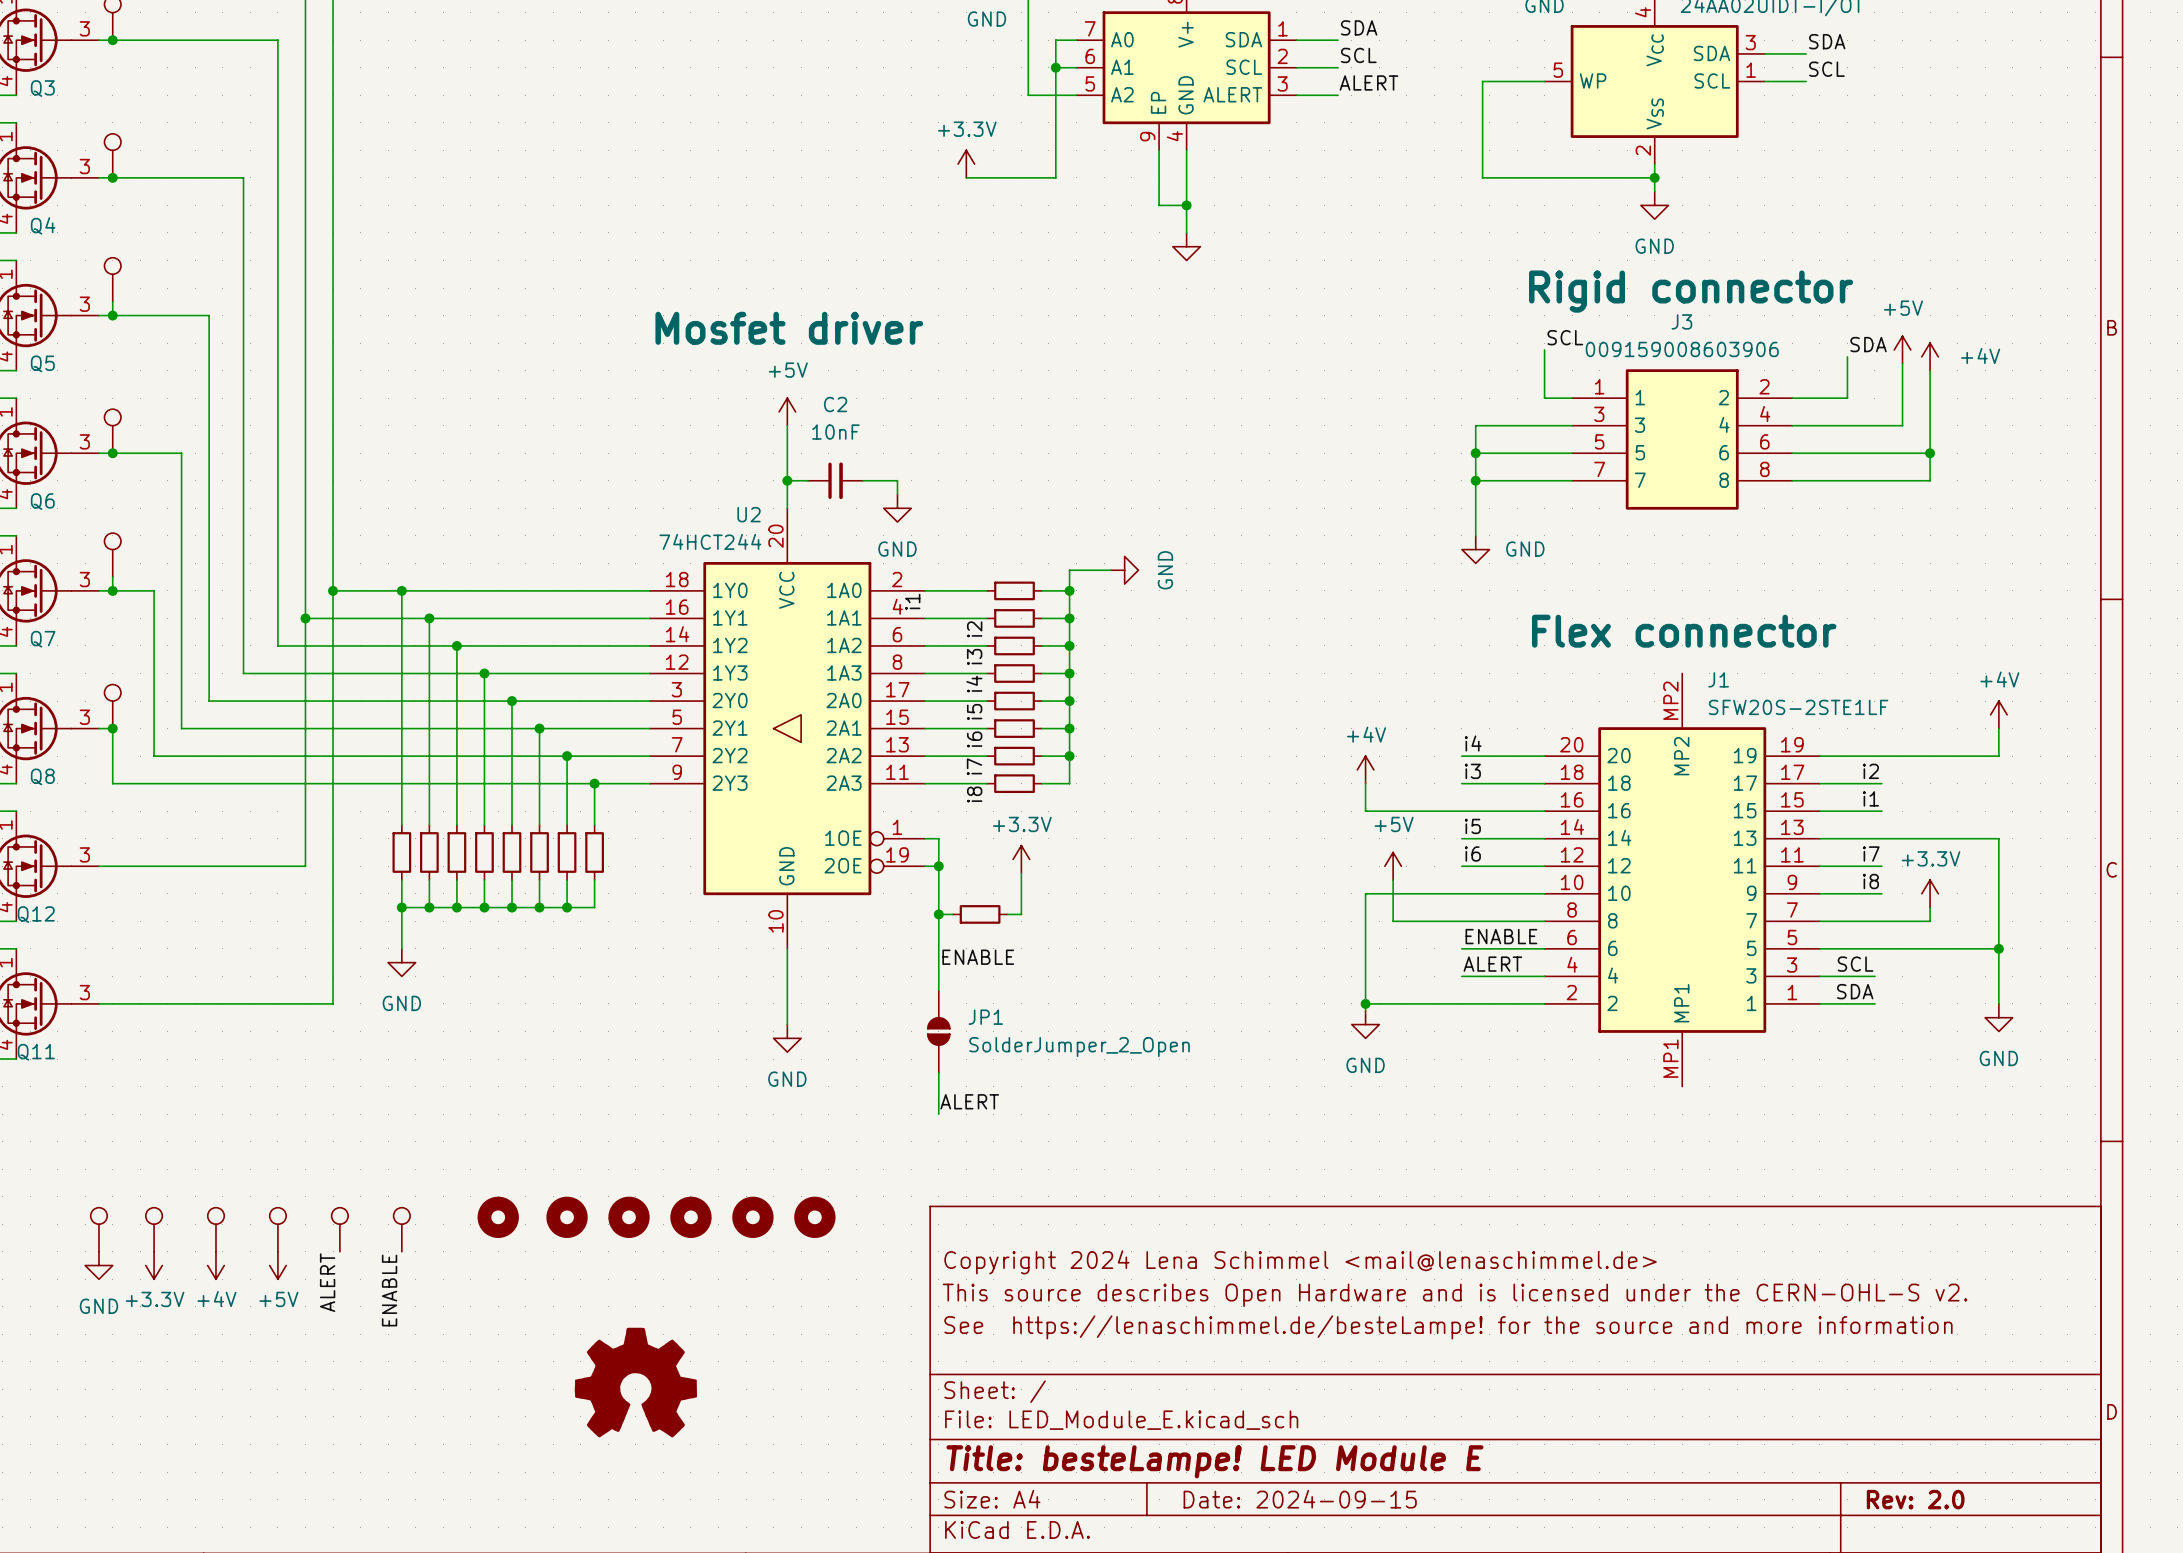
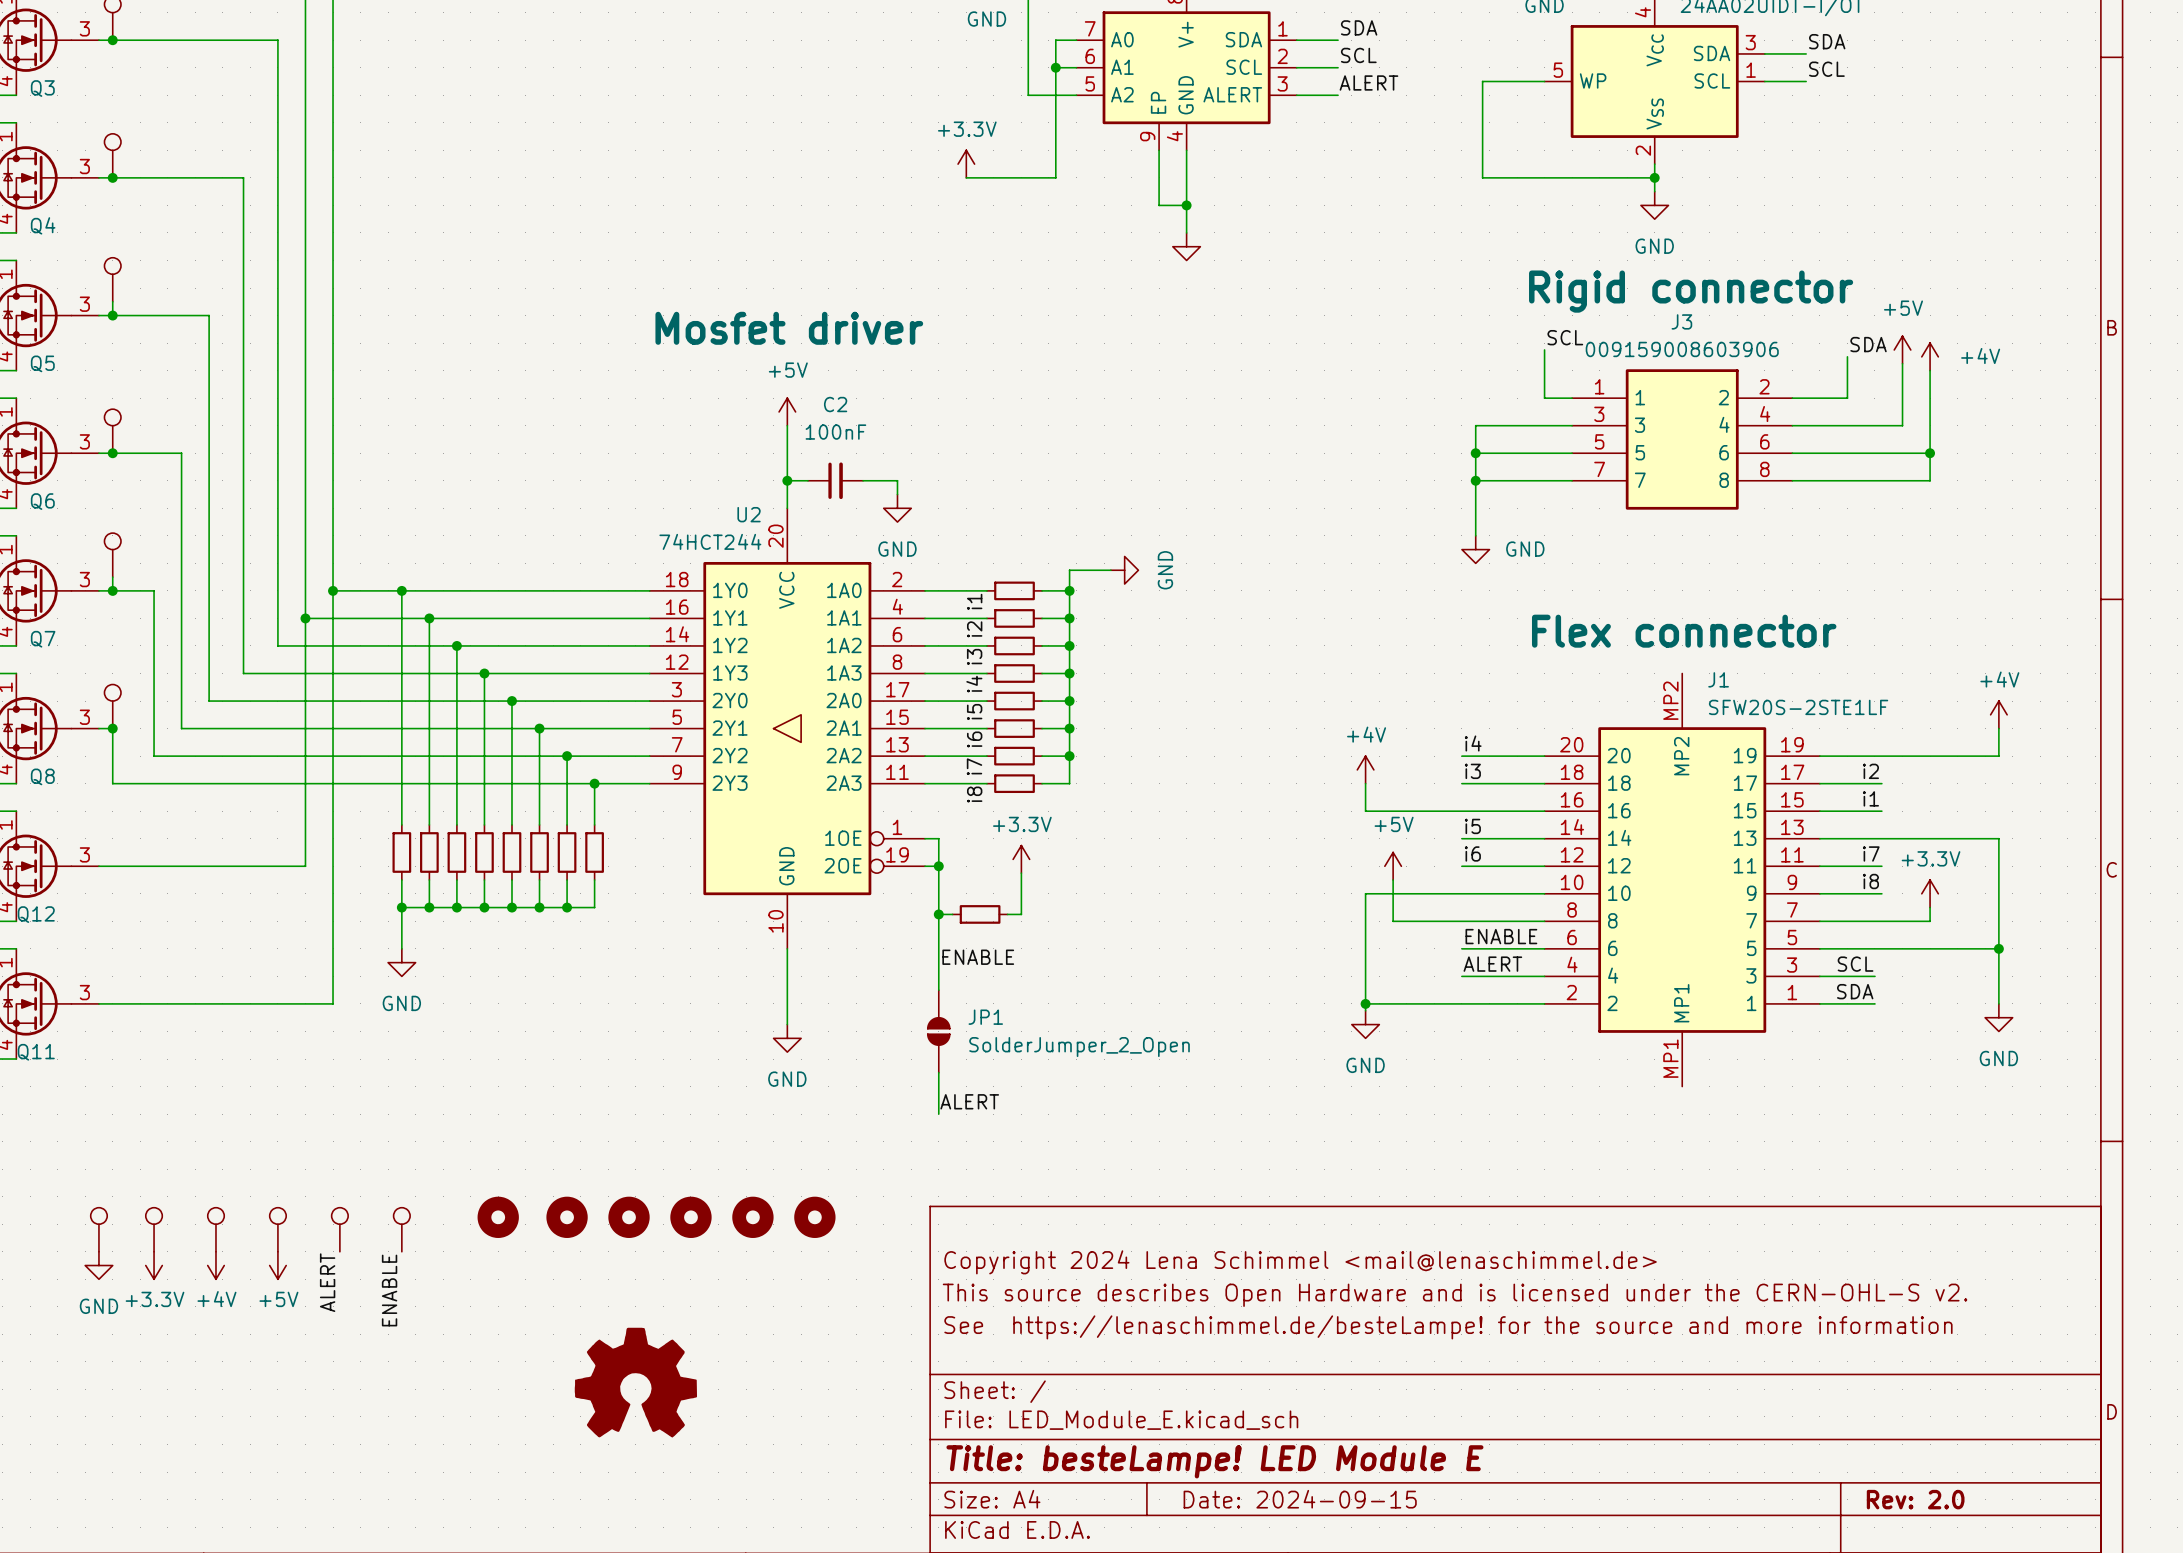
C2 value: 10nF (835, 432) -> 100nF (835, 432)
label position: i1 (912, 601) -> i1 (974, 601)

